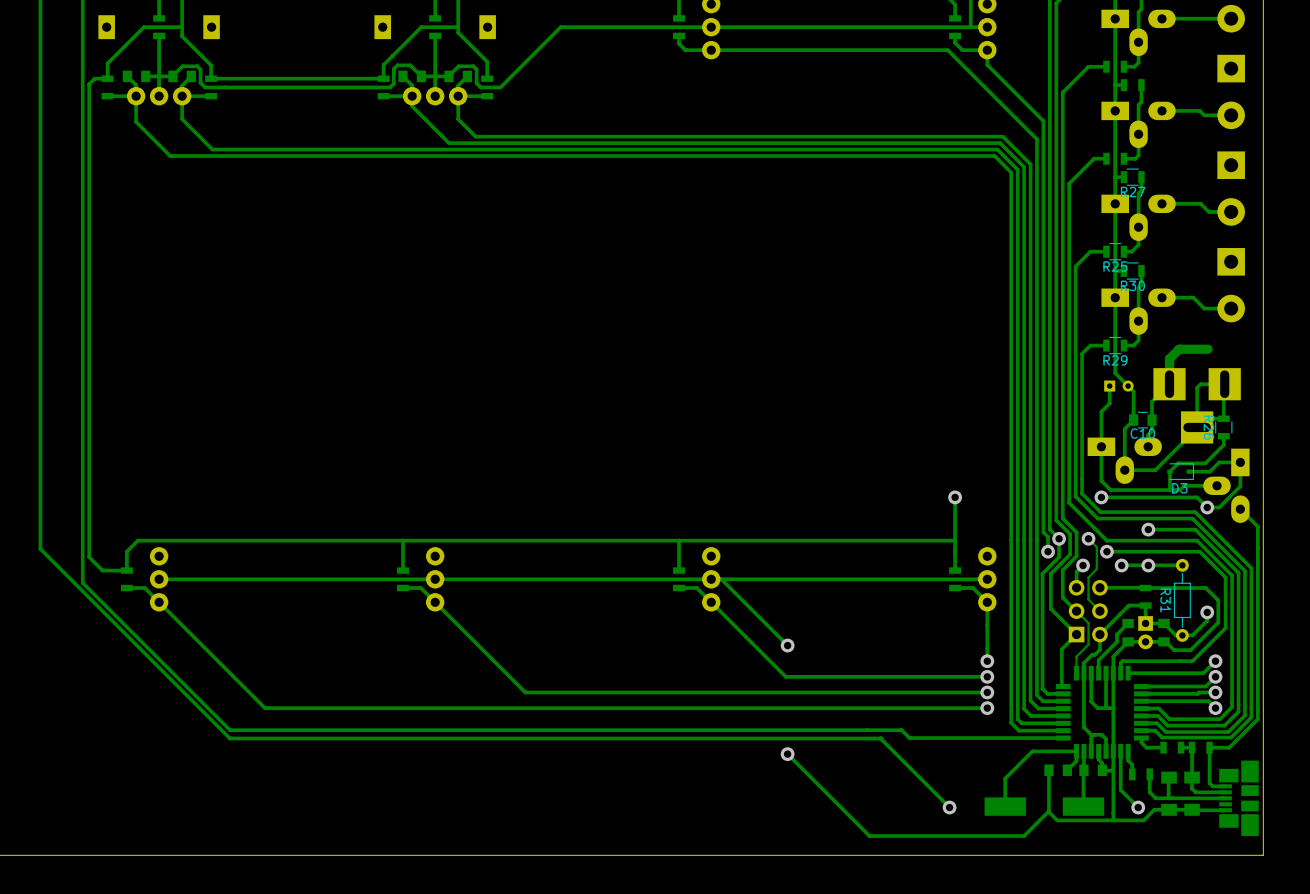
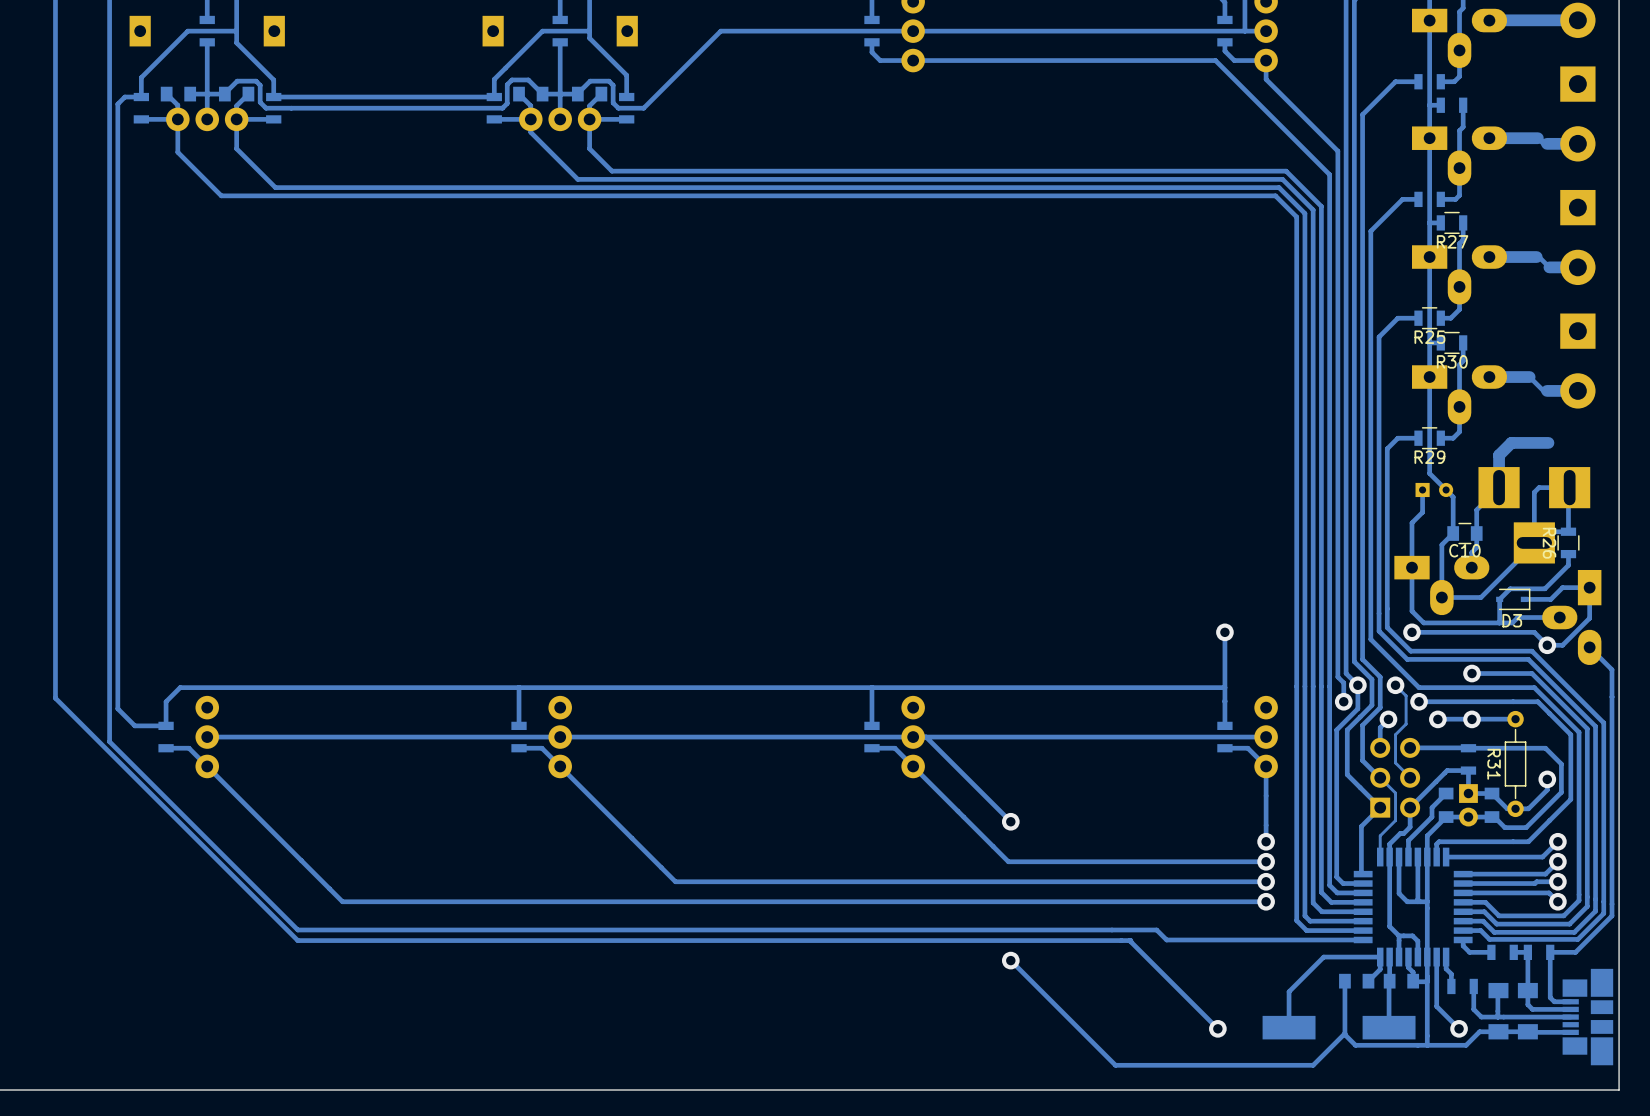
track width: thin (1226, 18) (1161, 18) -> thick (1572, 20) (1489, 20)
track width: thin (1199, 110) (1161, 110) -> thick (1537, 138) (1489, 138)
track width: thin (1226, 115) (1207, 115) -> thick (1572, 143) (1547, 143)
track width: thin (1198, 203) (1161, 203) -> thick (1536, 257) (1489, 257)
track width: thin (1226, 211) (1208, 211) -> thick (1572, 267) (1549, 267)
track width: thin (1193, 297) (1161, 297) -> thick (1529, 377) (1489, 377)
track width: thin (1226, 308) (1207, 308) -> thick (1572, 390) (1547, 390)

